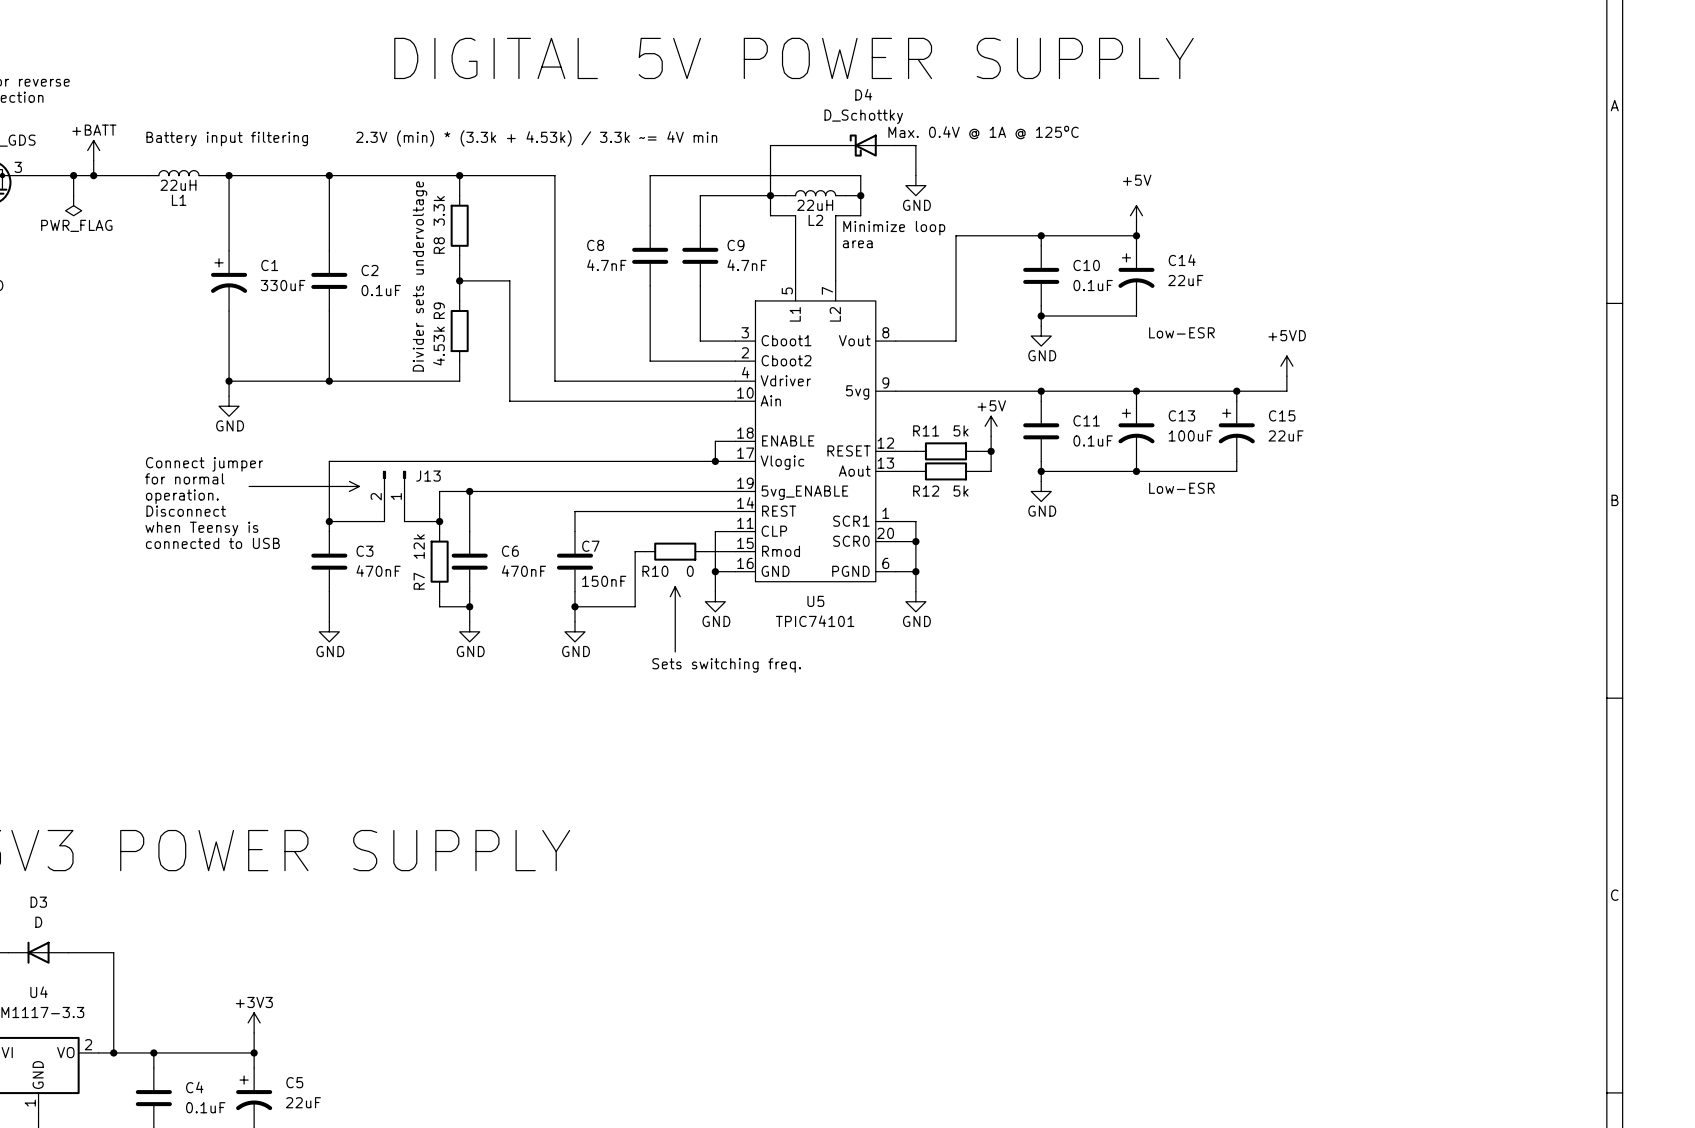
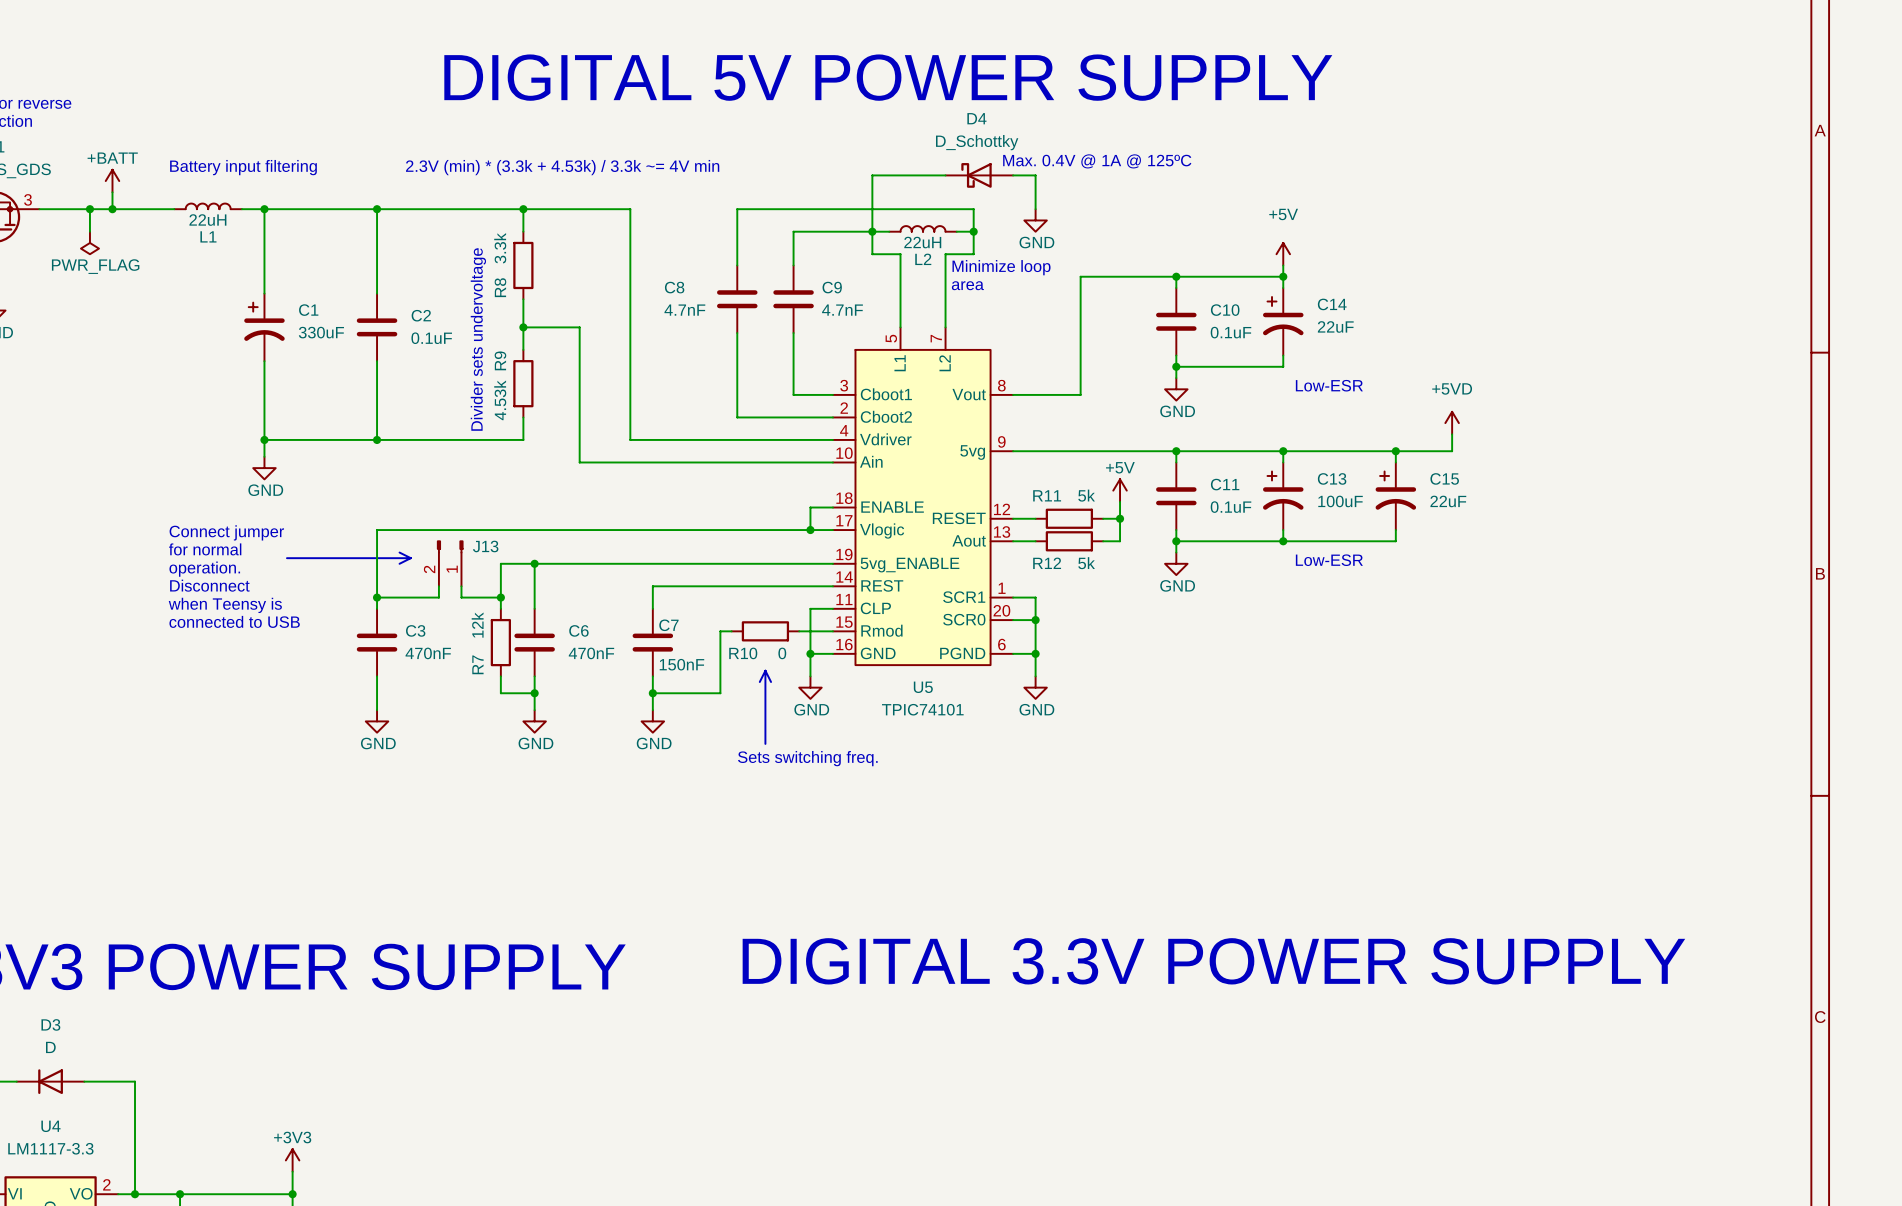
text: none -> DIGITAL 3.3V POWER SUPPLY (1213, 961)

